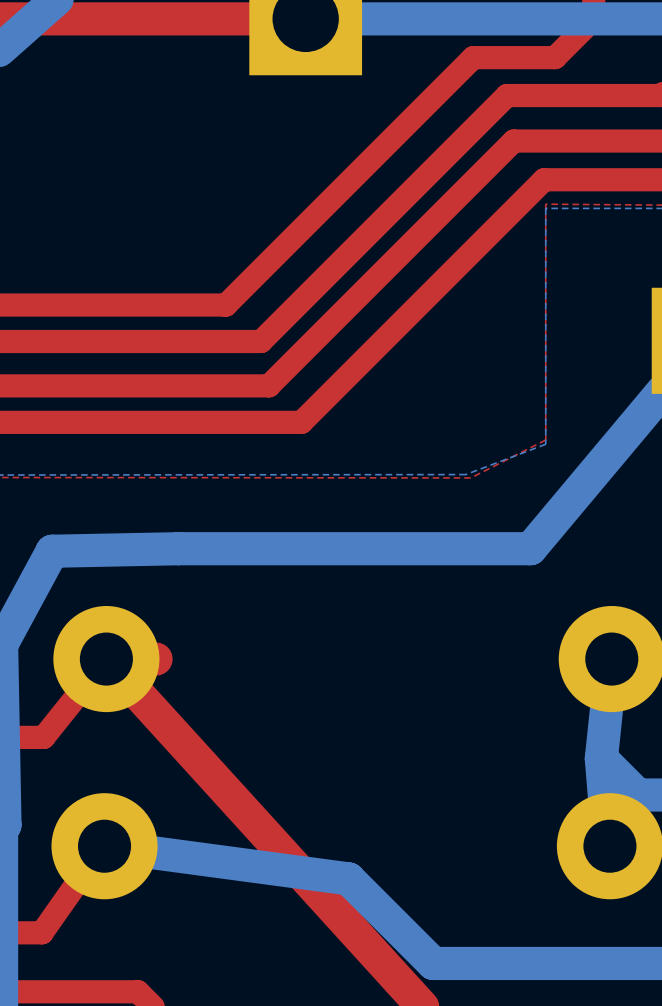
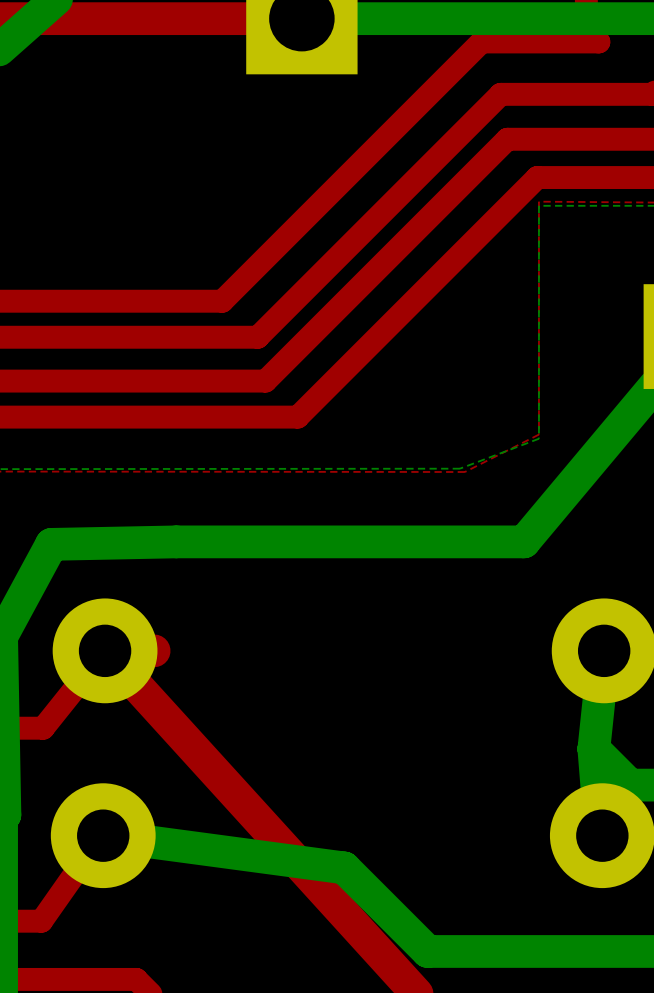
top track: (593, 18) (555, 57) (473, 57) (225, 305) -> (482, 41) (222, 301)
top track: none -> (586, 18) (586, 29) (598, 41) (481, 41)

